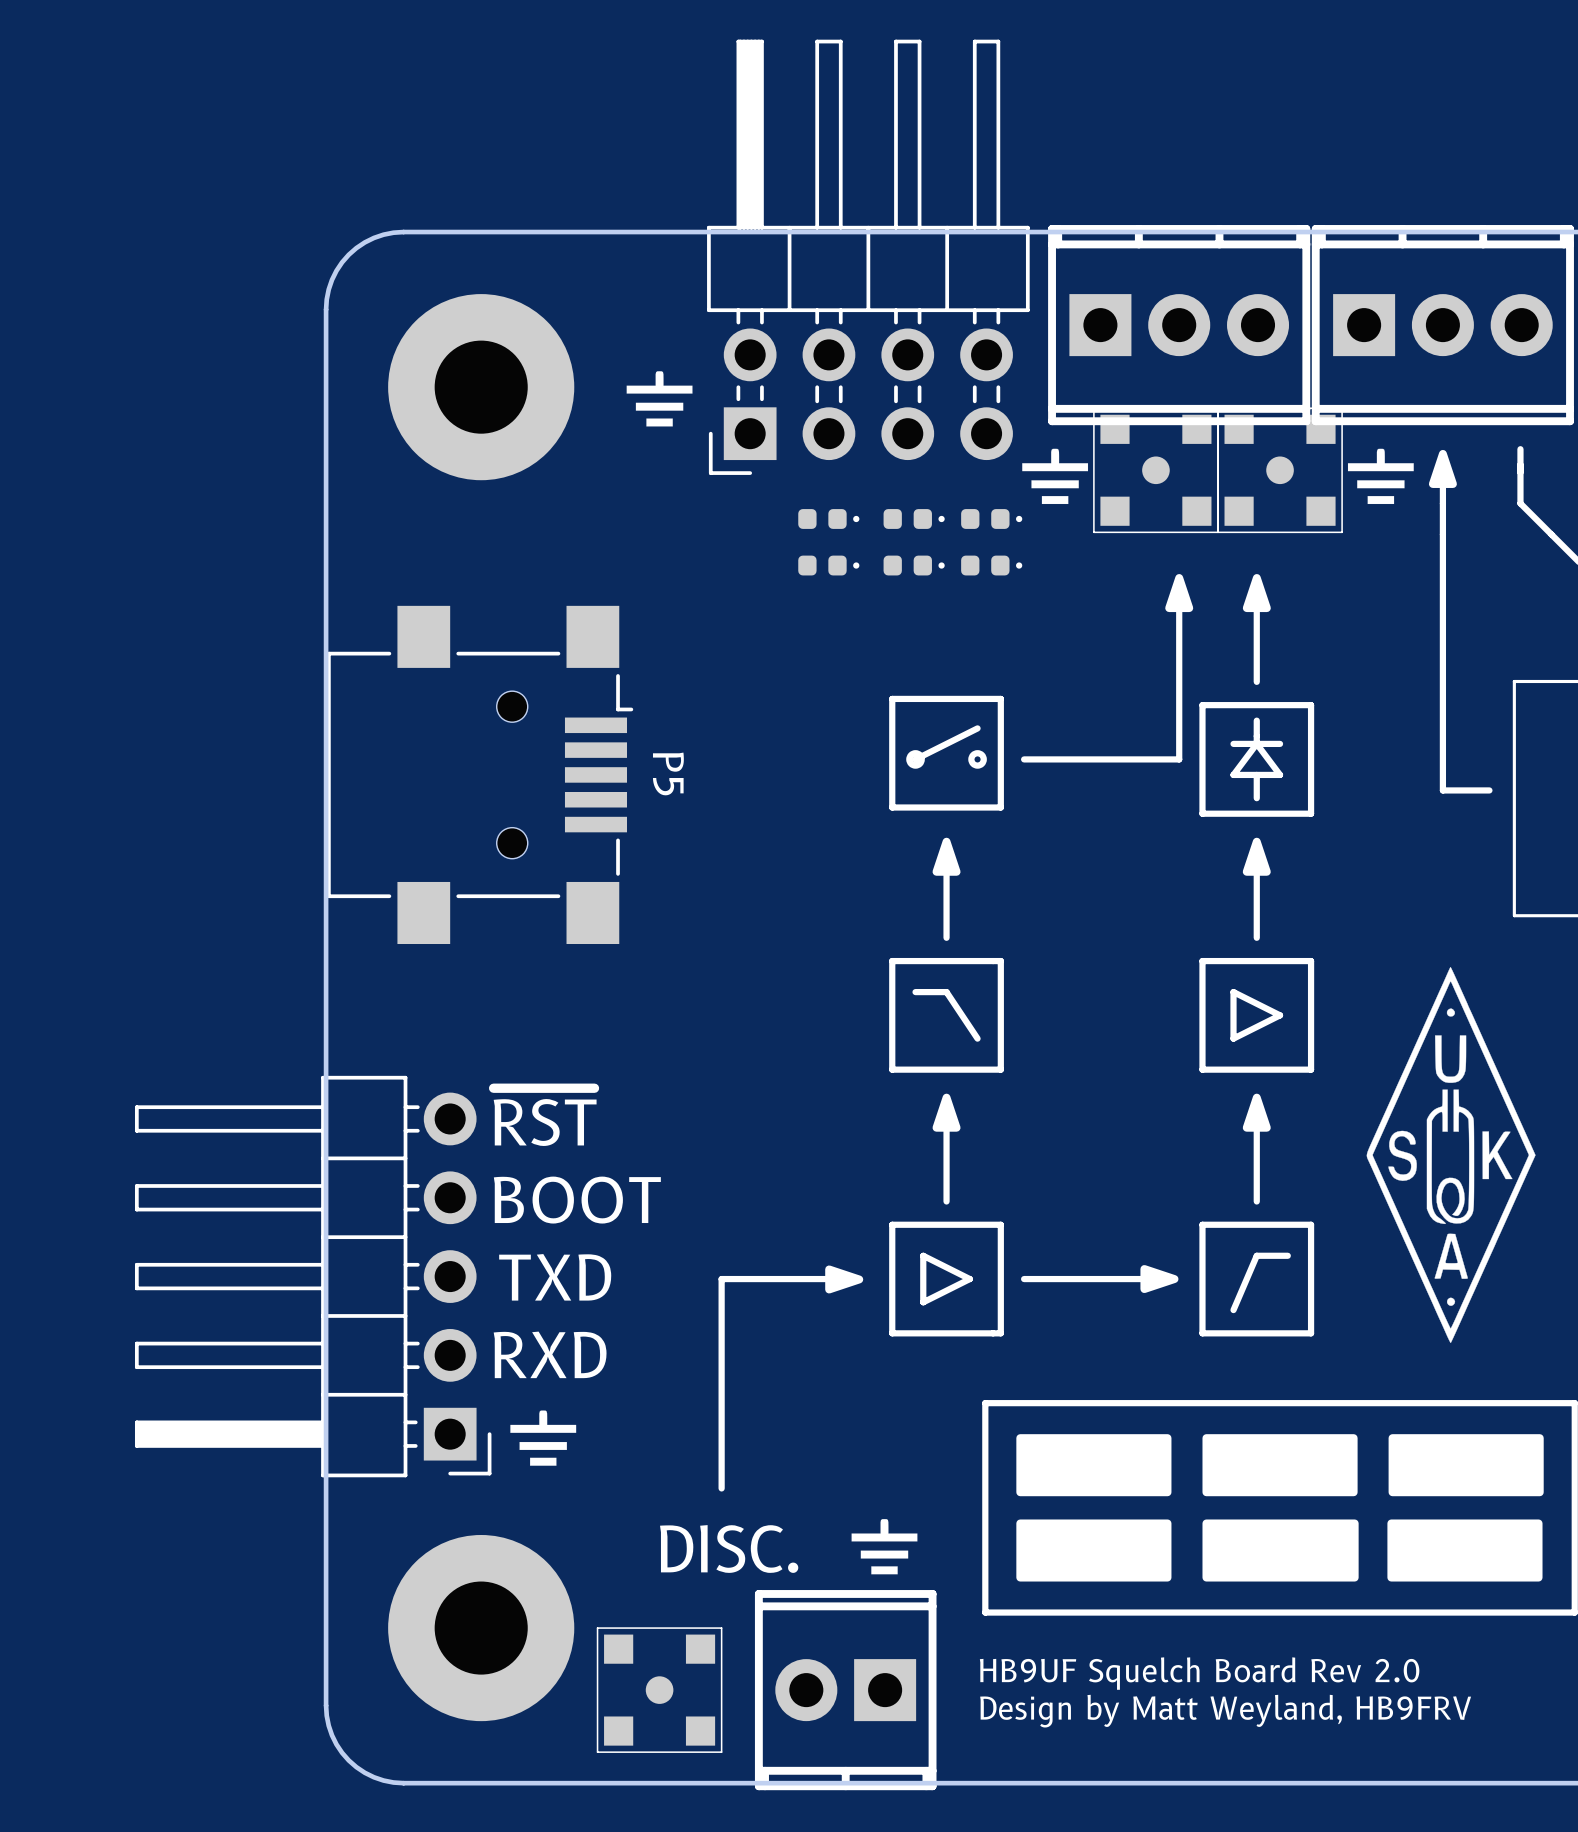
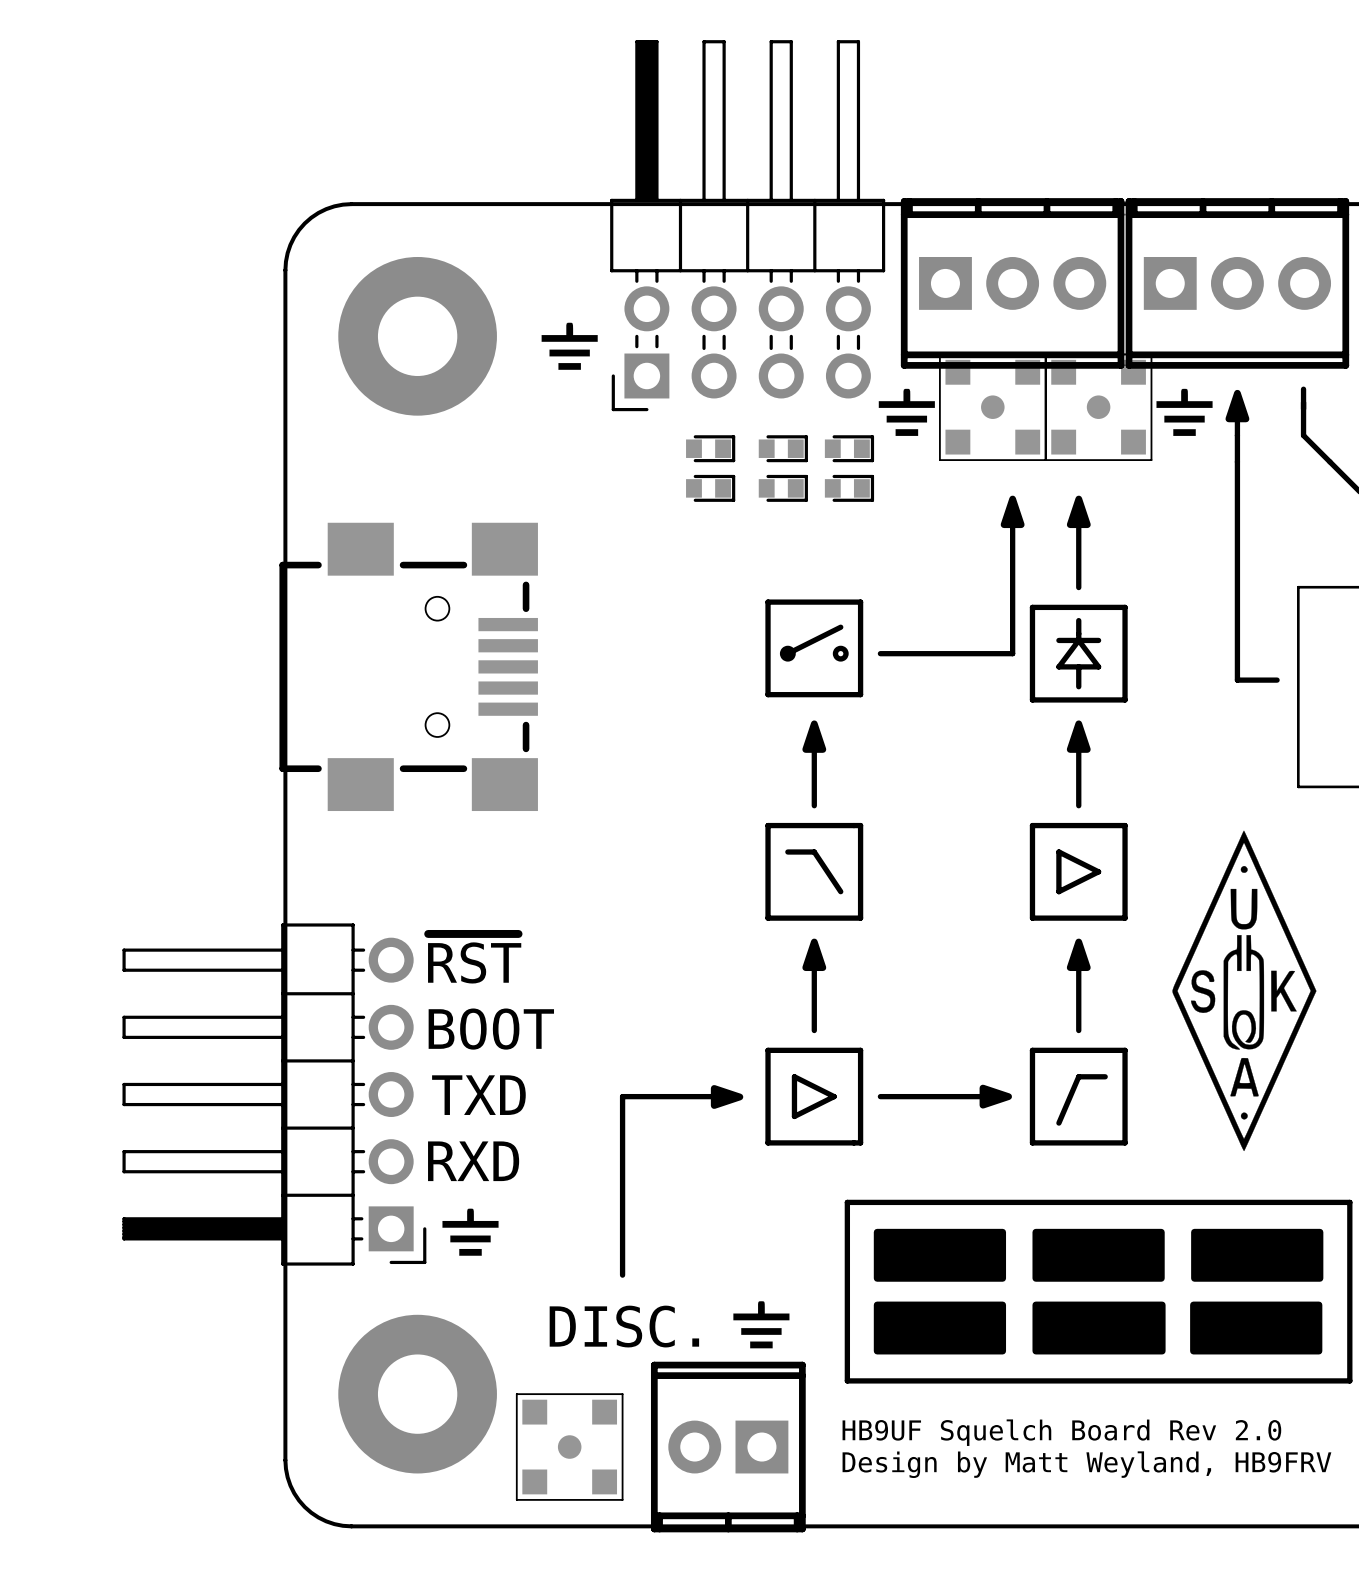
part footprint: [798, 509, 860, 529] -> [686, 435, 736, 463]
part footprint: [883, 509, 945, 529] -> [758, 435, 808, 463]
part footprint: [961, 509, 1023, 529] -> [824, 435, 875, 463]
part footprint: [798, 555, 860, 576] -> [686, 474, 736, 502]
part footprint: [883, 555, 945, 576] -> [758, 474, 808, 502]
part footprint: [961, 555, 1023, 576] -> [824, 474, 875, 502]
part: none -> (408, 666)
P5: (480, 774) -> none

